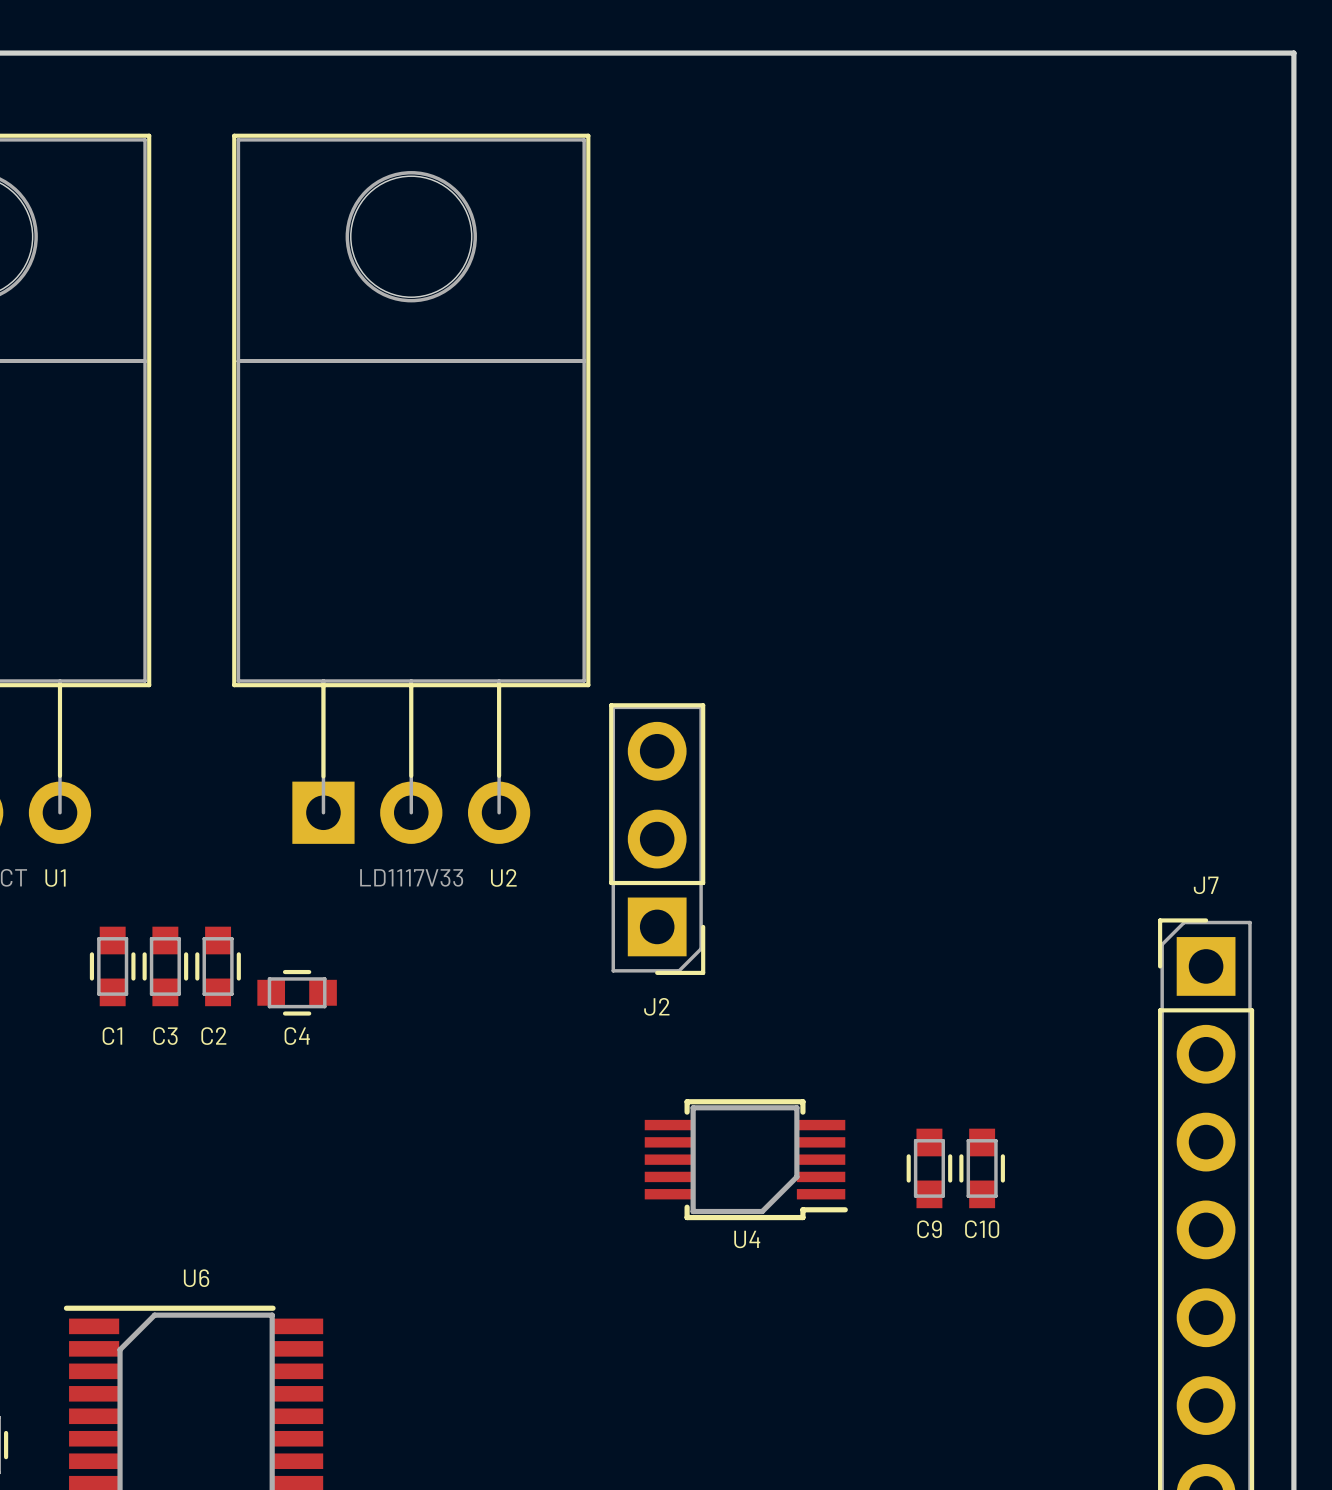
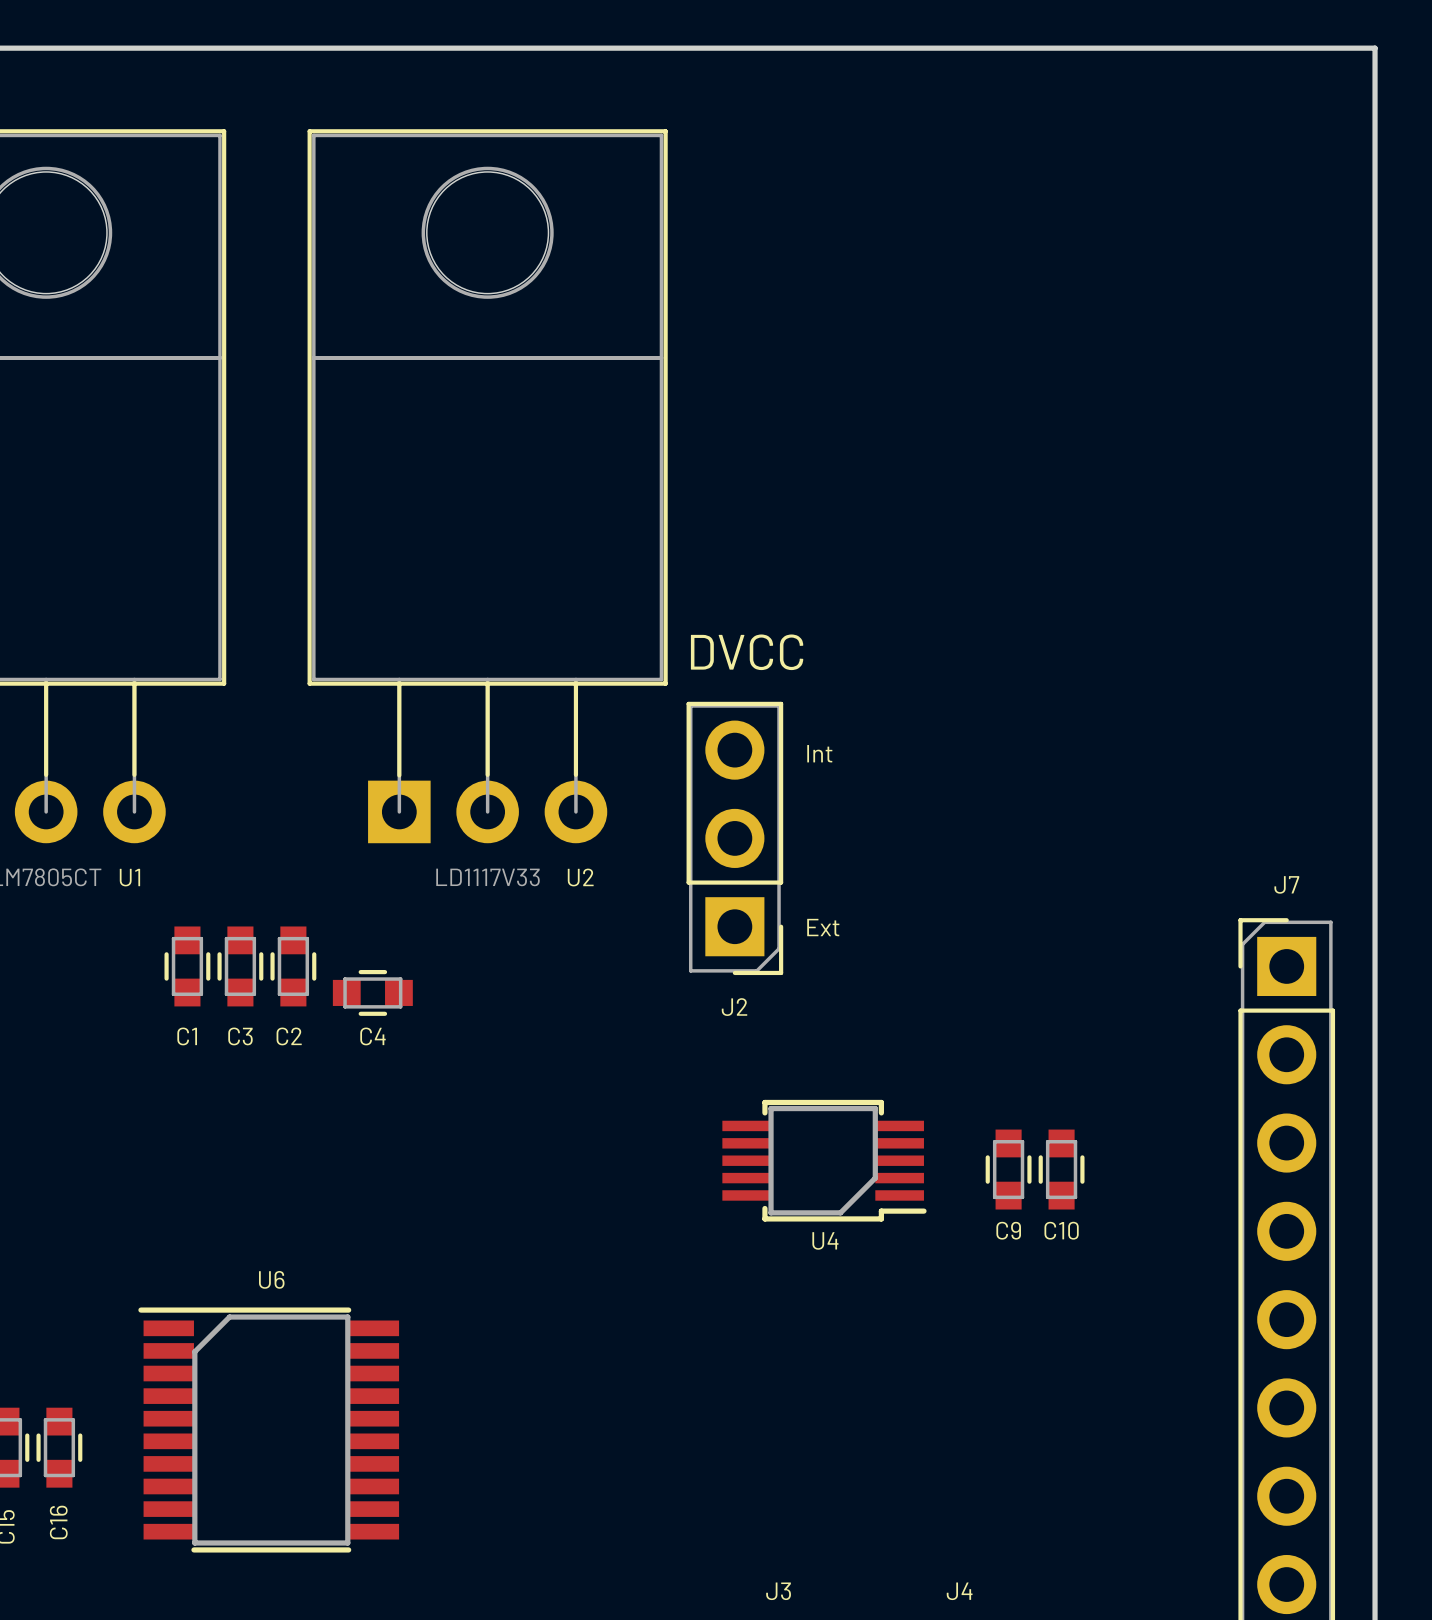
text: none -> DVCC (747, 652)
text: none -> Int (819, 753)
text: none -> Ext (823, 927)

